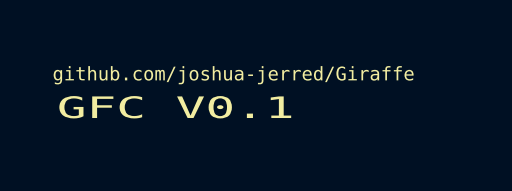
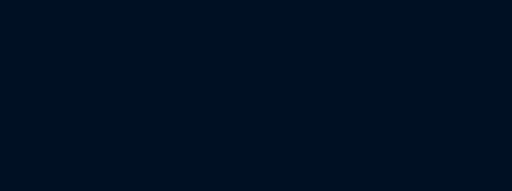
text: github.com/joshua-jerred/Giraffe (233, 75) -> none
text: GFC V0.1 (175, 107) -> none

